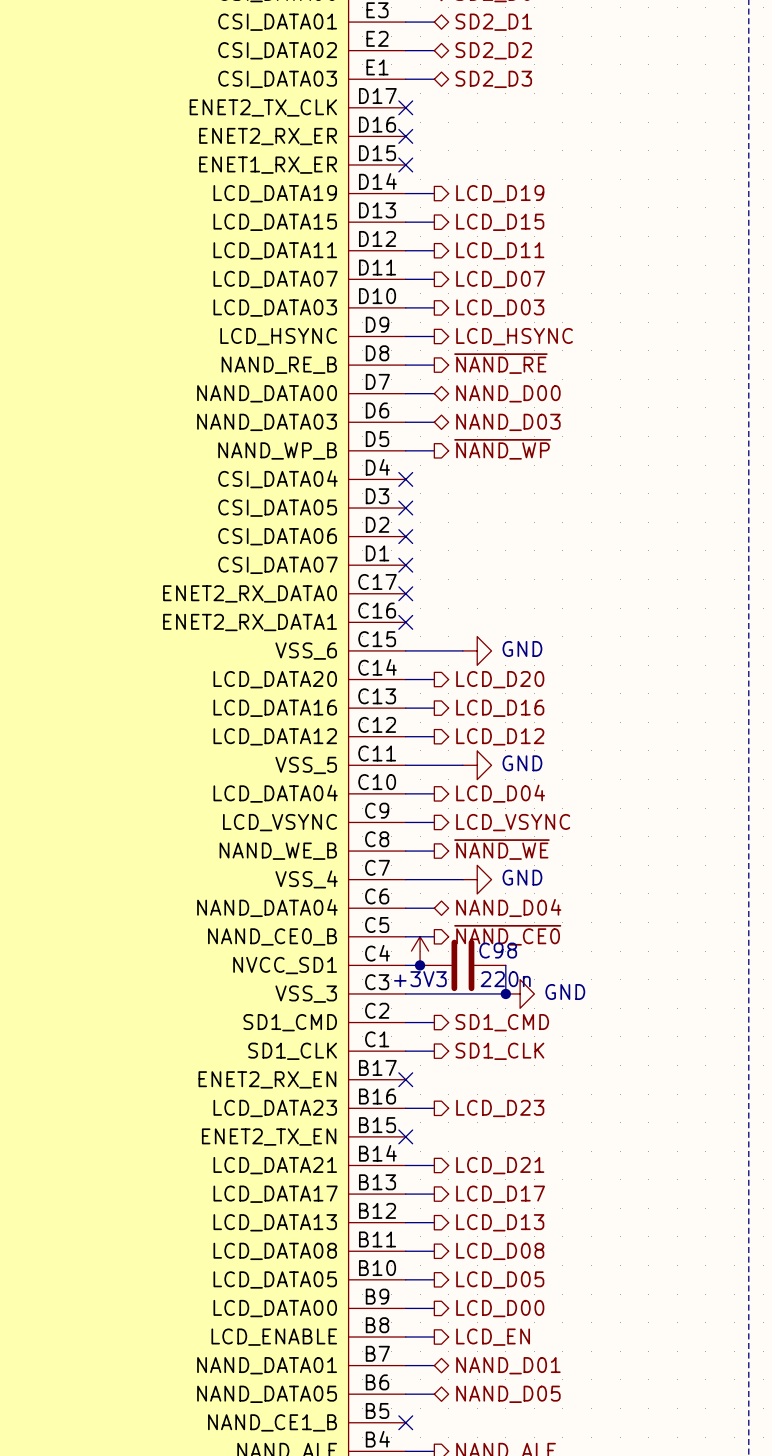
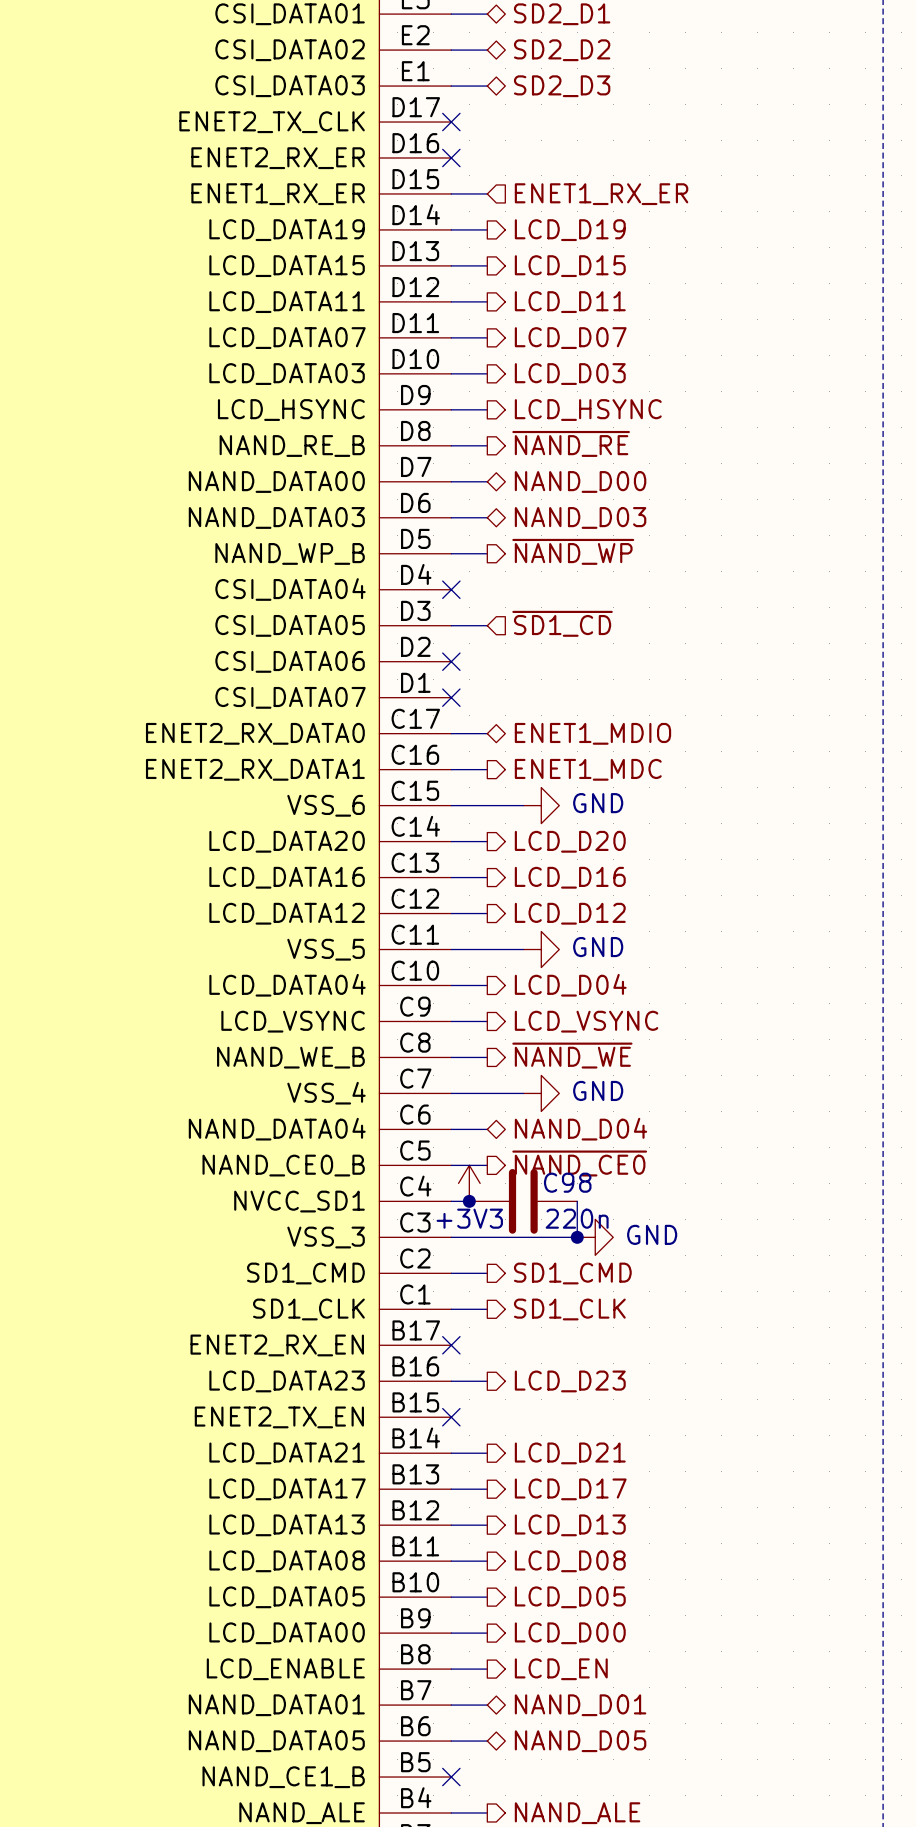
wire: none -> (451, 193) (487, 193)
no-connect mark: (405, 164) -> none
hierarchical label: none -> ENET1_RX_ER (601, 194)
hierarchical label: none -> ~{SD1_CD} (562, 623)
wire: none -> (451, 625) (487, 625)
no-connect mark: (405, 508) -> none
wire: none -> (451, 733) (487, 733)
no-connect mark: (405, 593) -> none
hierarchical label: none -> ENET1_MDIO (592, 733)
wire: none -> (451, 769) (487, 769)
no-connect mark: (405, 622) -> none
hierarchical label: none -> ENET1_MDC (588, 769)

